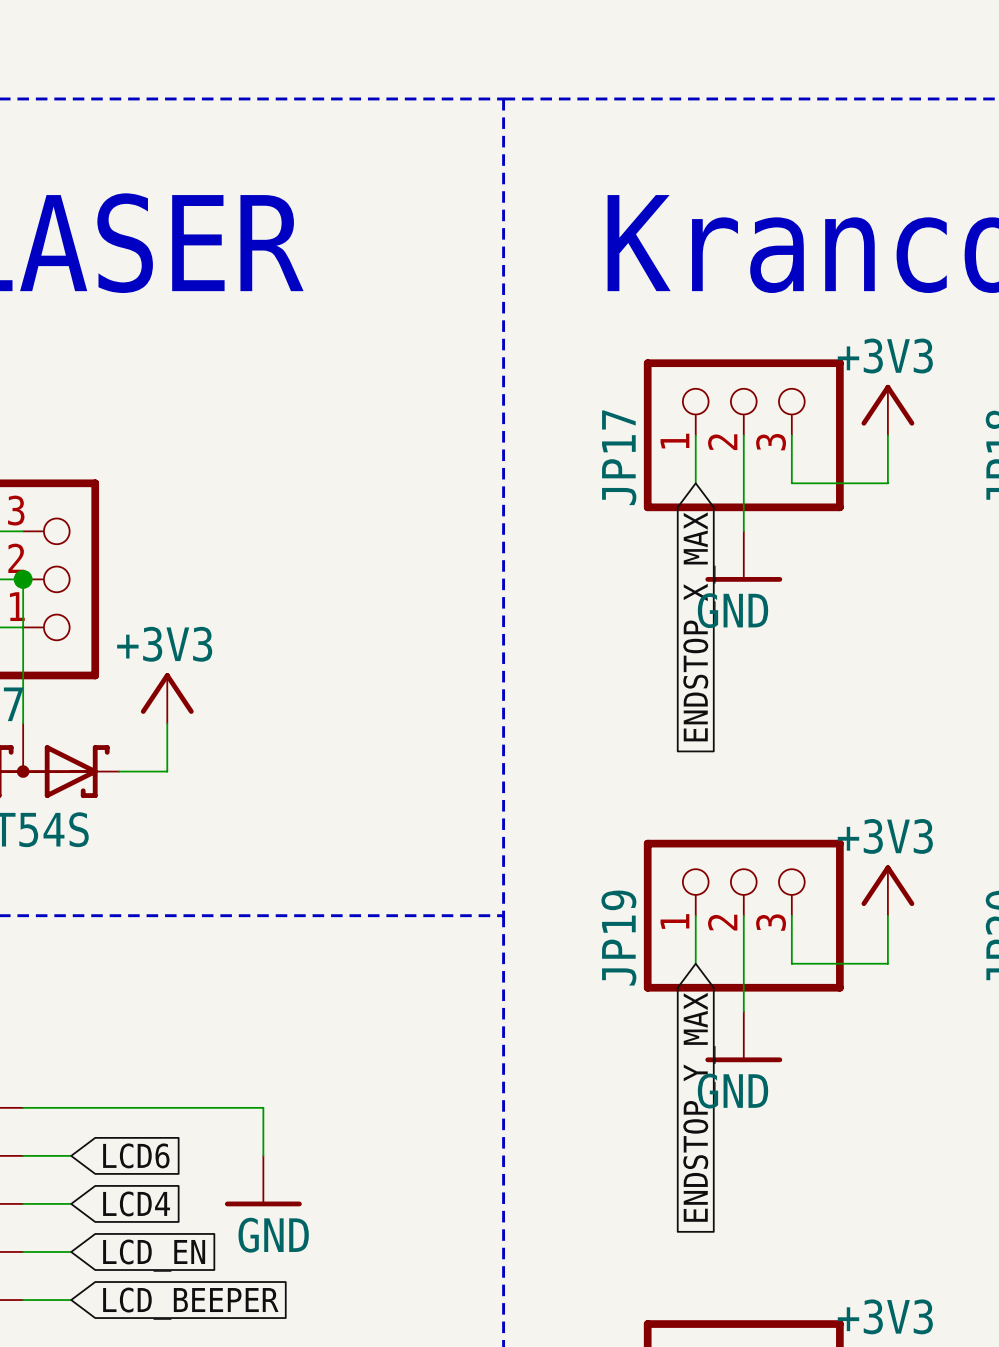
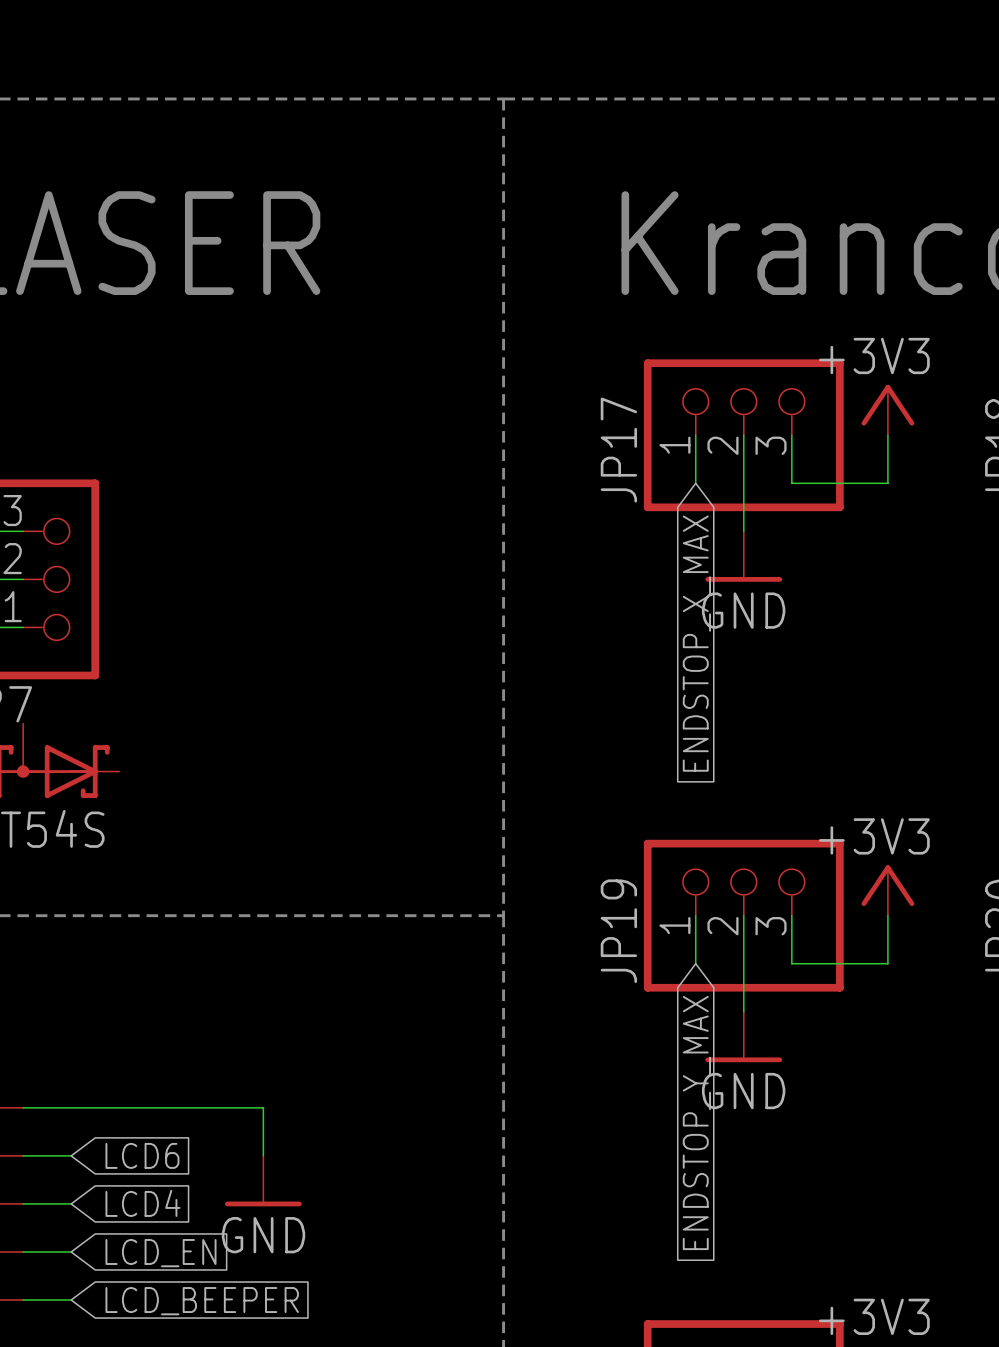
wire: (23, 579) (23, 723) -> none
junction: (23, 579) -> none
power symbol: +3V3 (167, 698) -> none
wire: (167, 723) (167, 771) (119, 771) -> none

